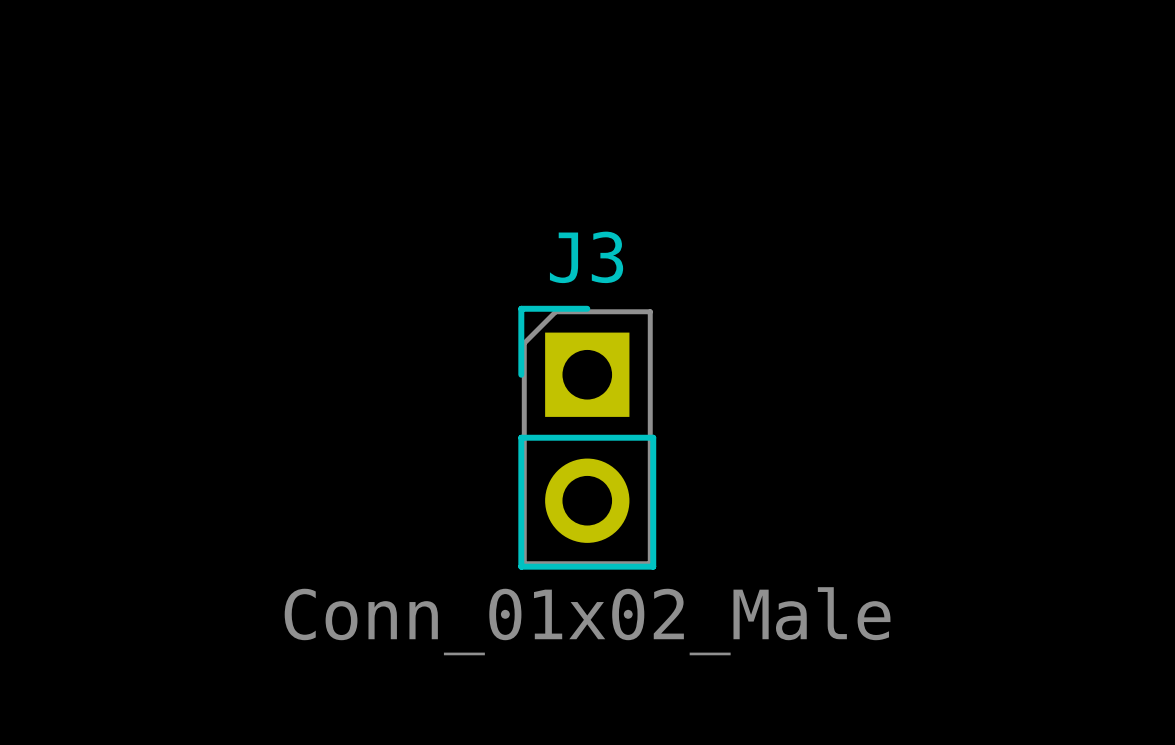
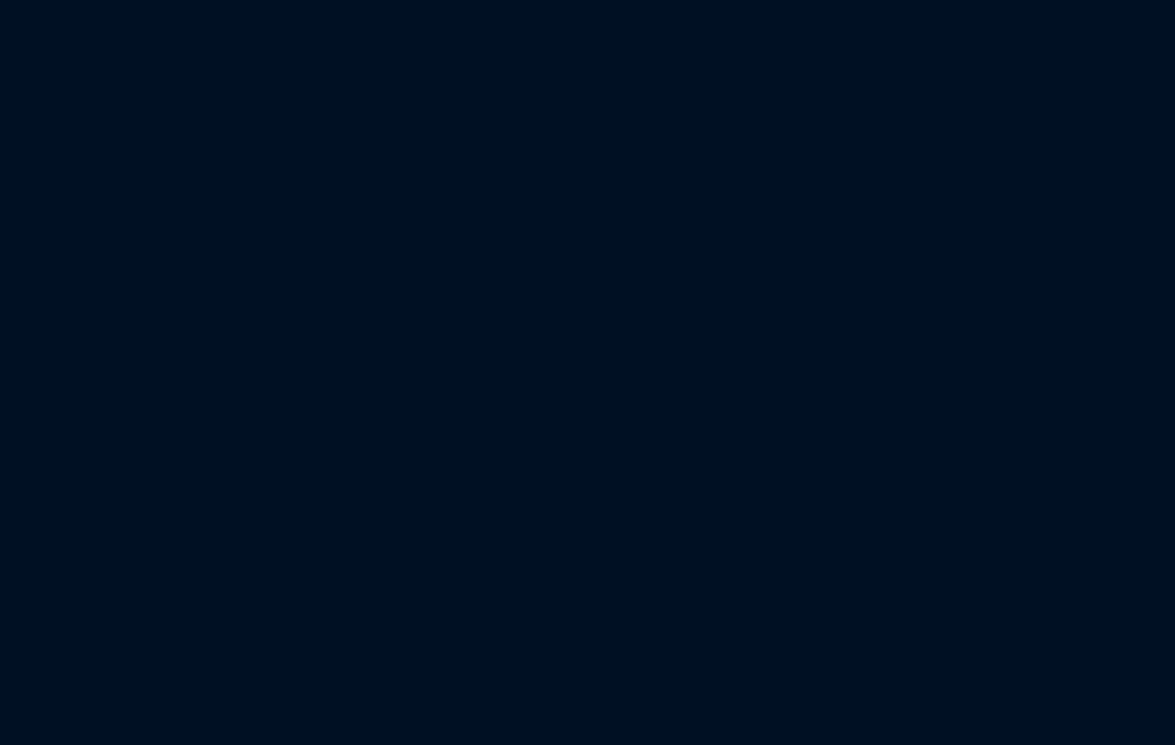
J3: Conn_01x02_Male (587, 437) -> none

